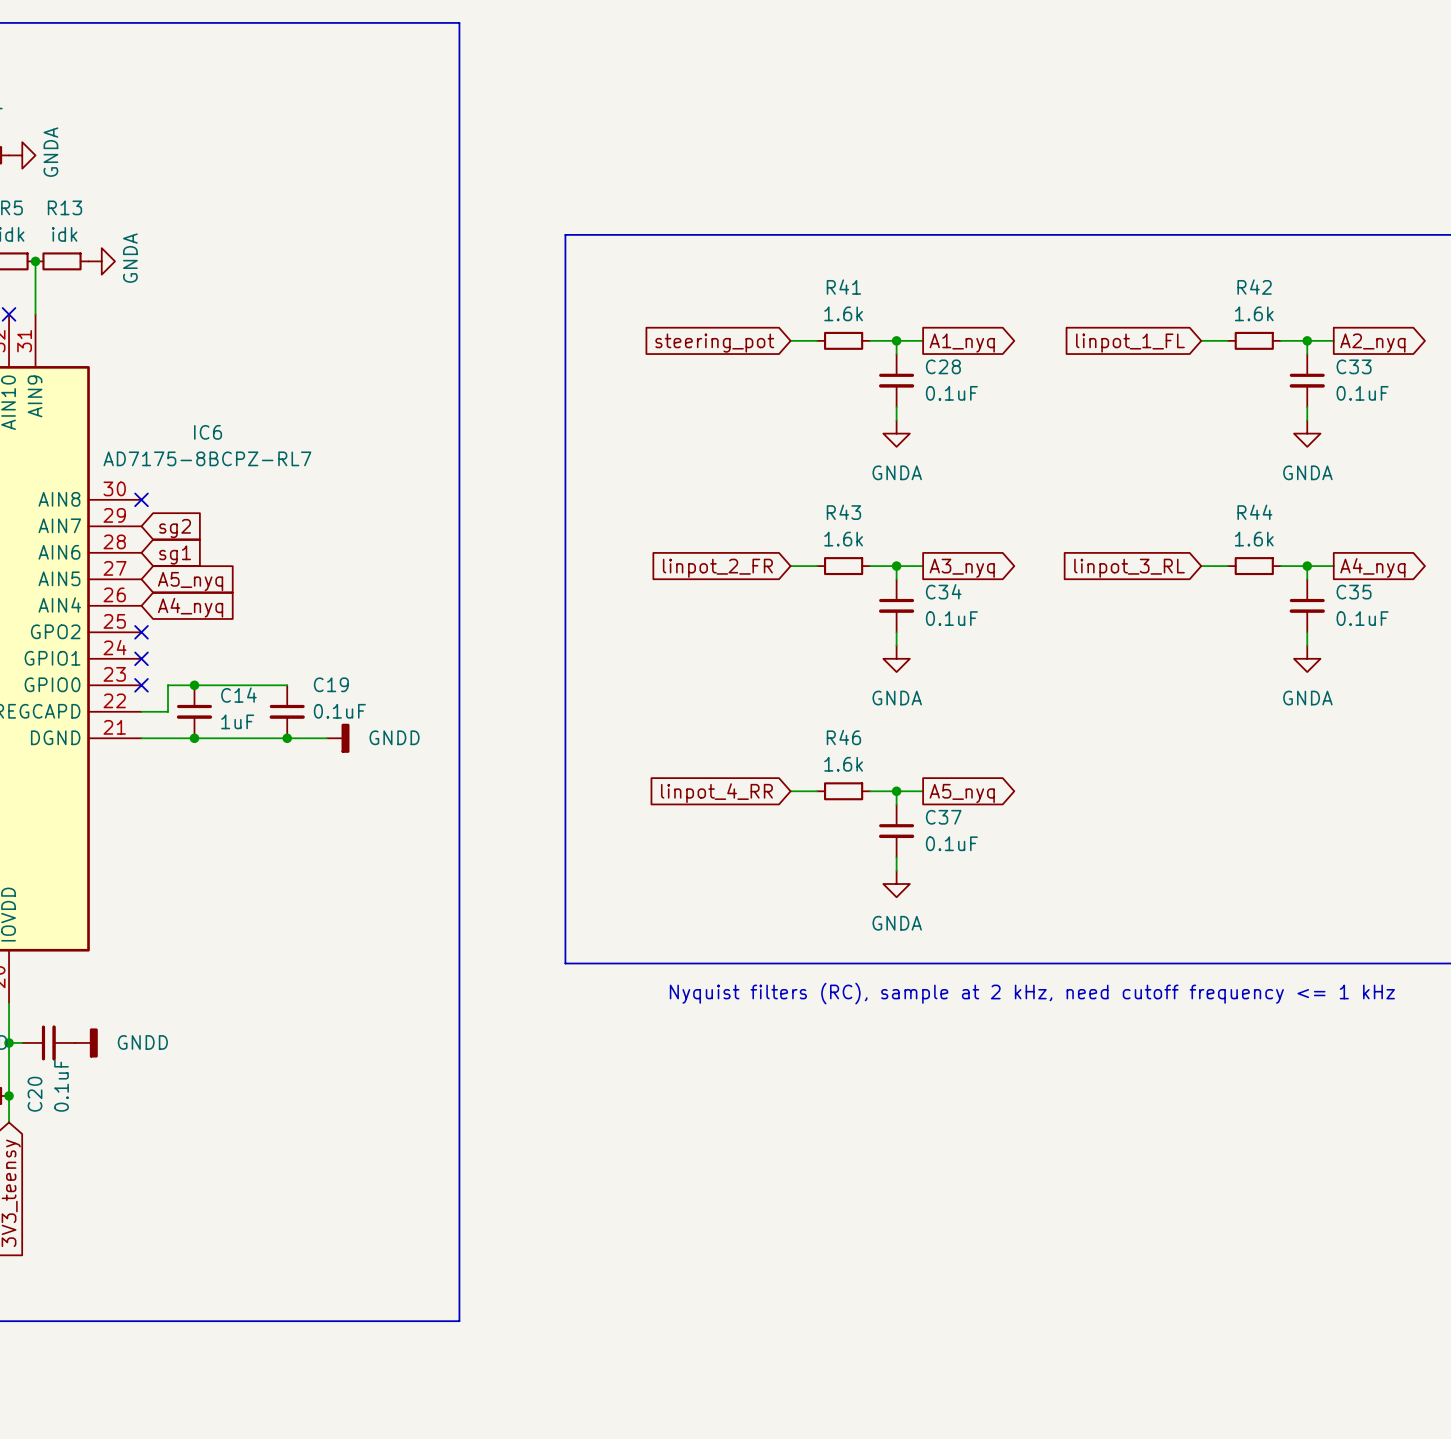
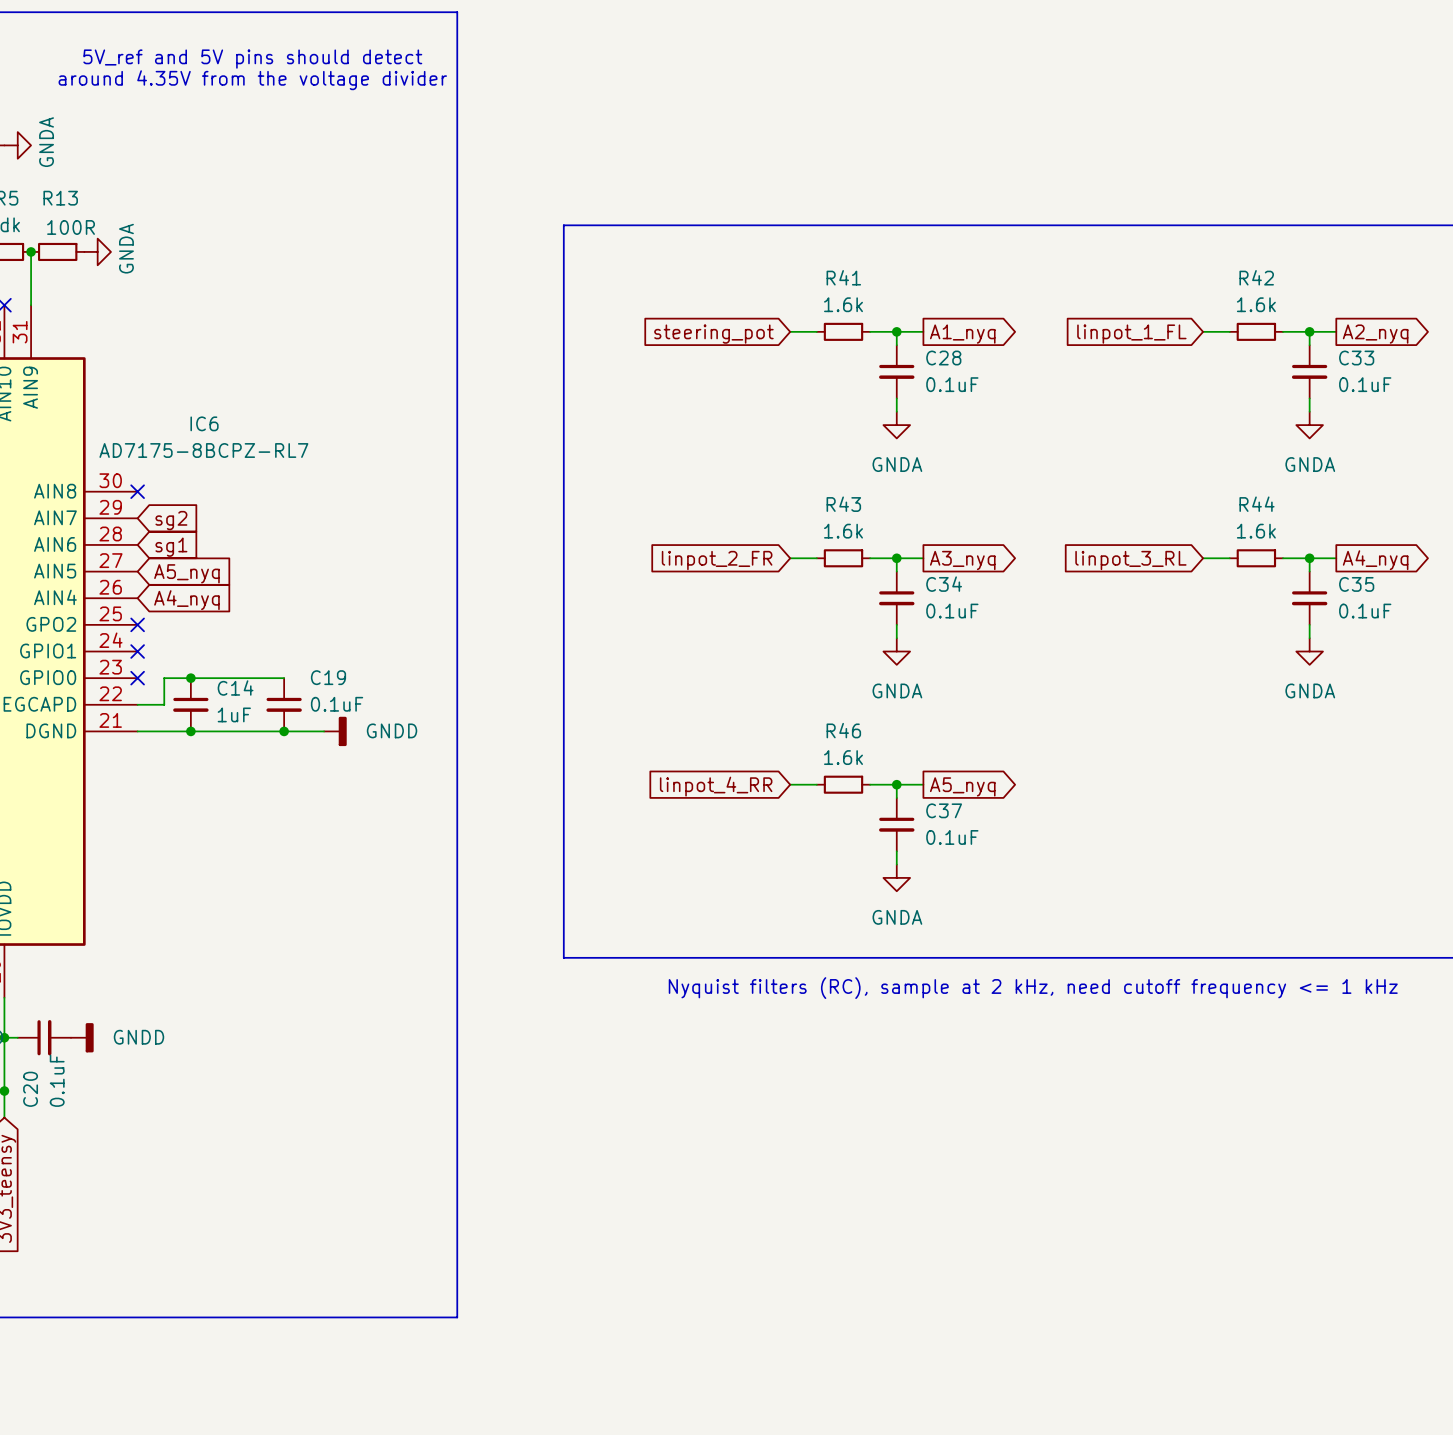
text: none -> 5V_ref and 5V pins should detect (252, 59)
text: none -> around 4.35V from the voltage divider (252, 80)
R13 value: idk (64, 234) -> 100R (71, 227)

